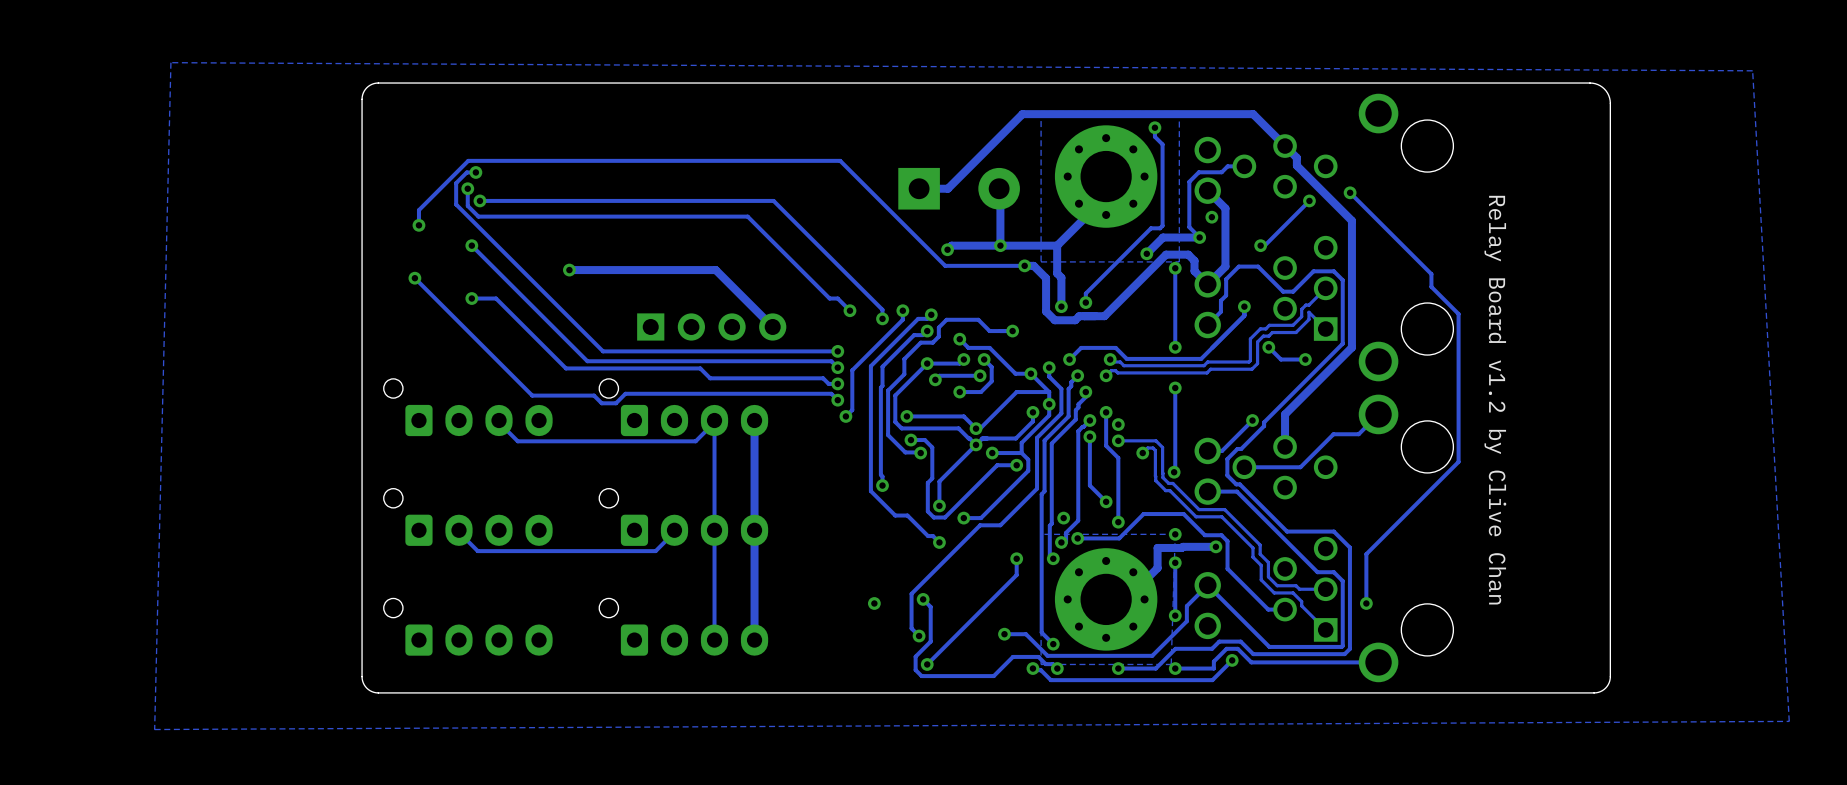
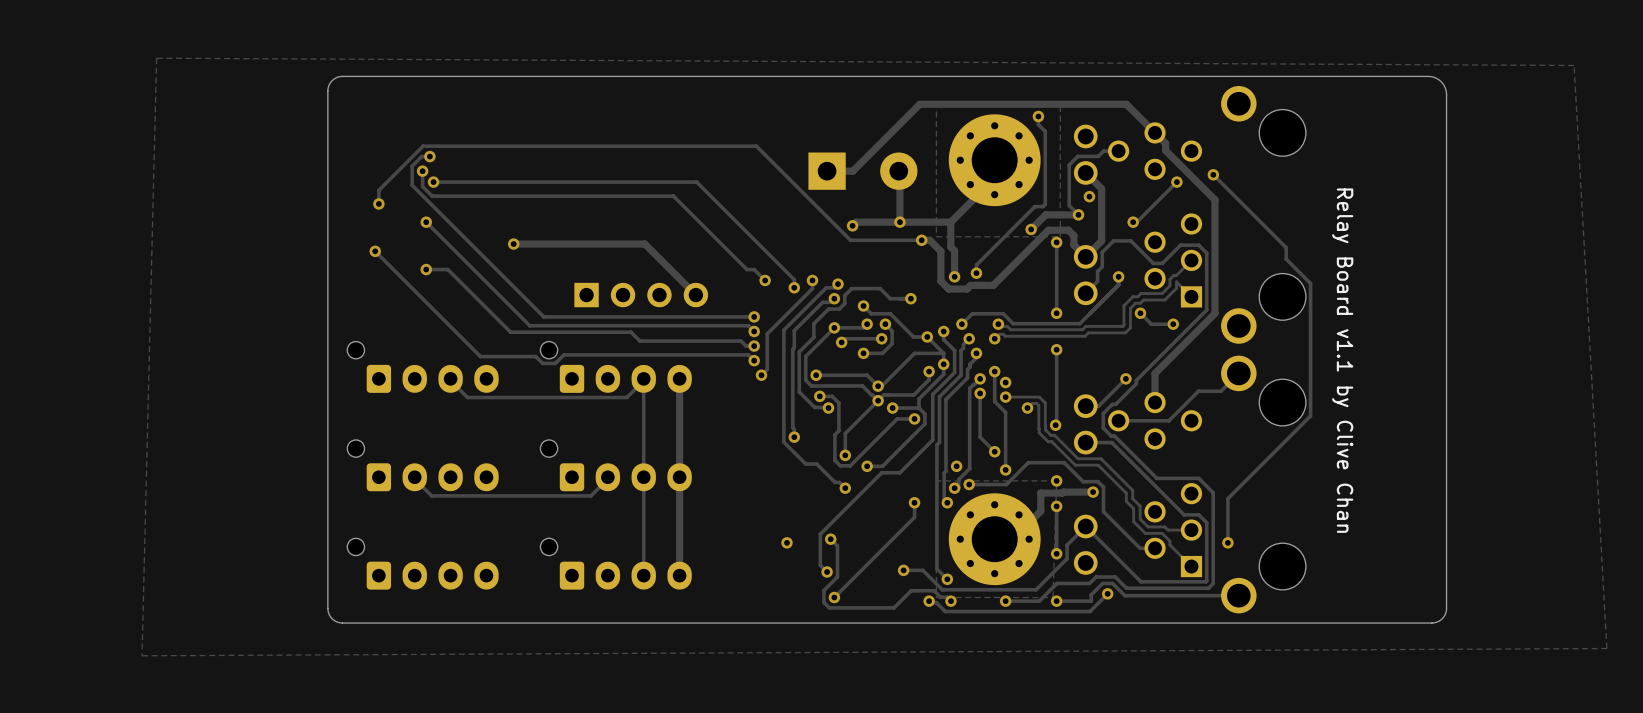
text: Relay Board v1.2 by Clive Chan (1495, 400) -> Relay Board v1.1 by Clive Chan (1342, 360)

